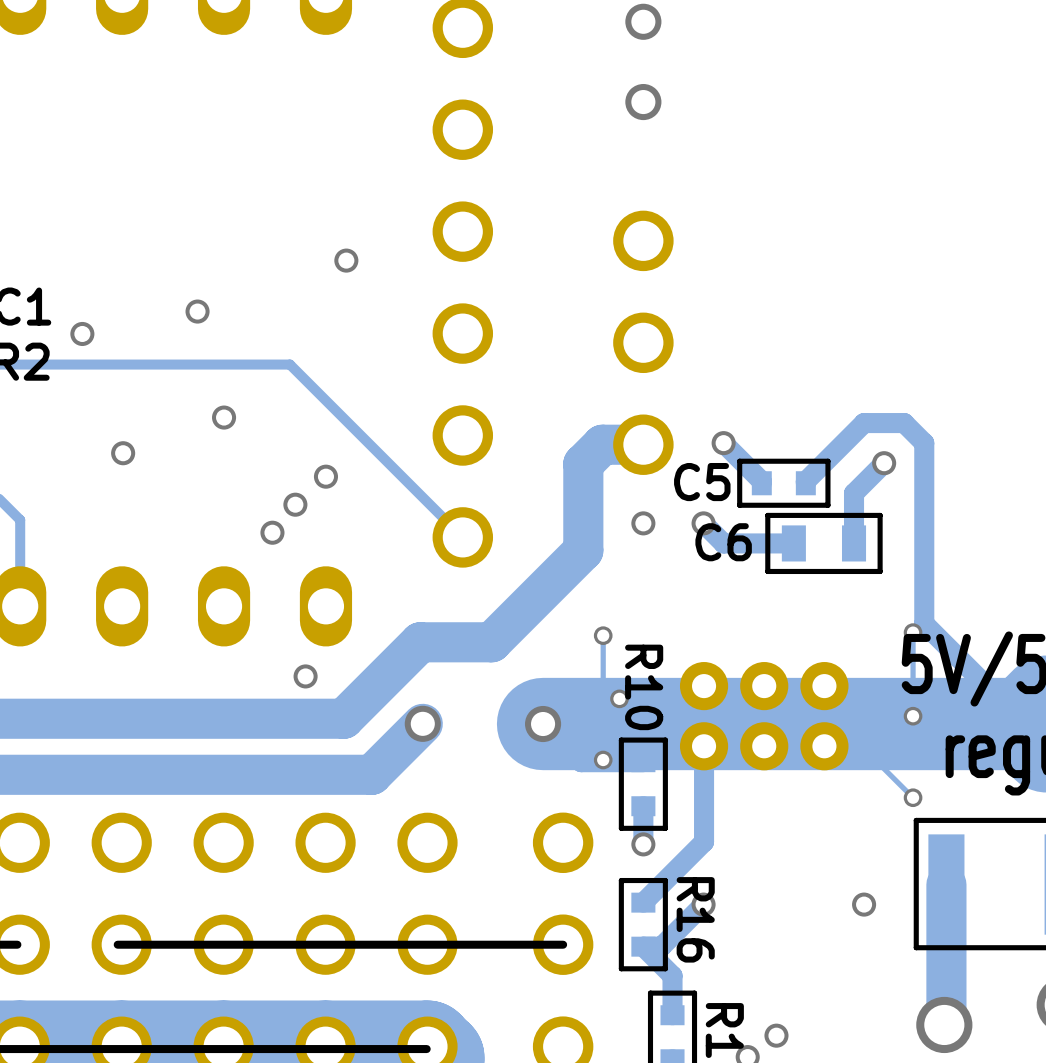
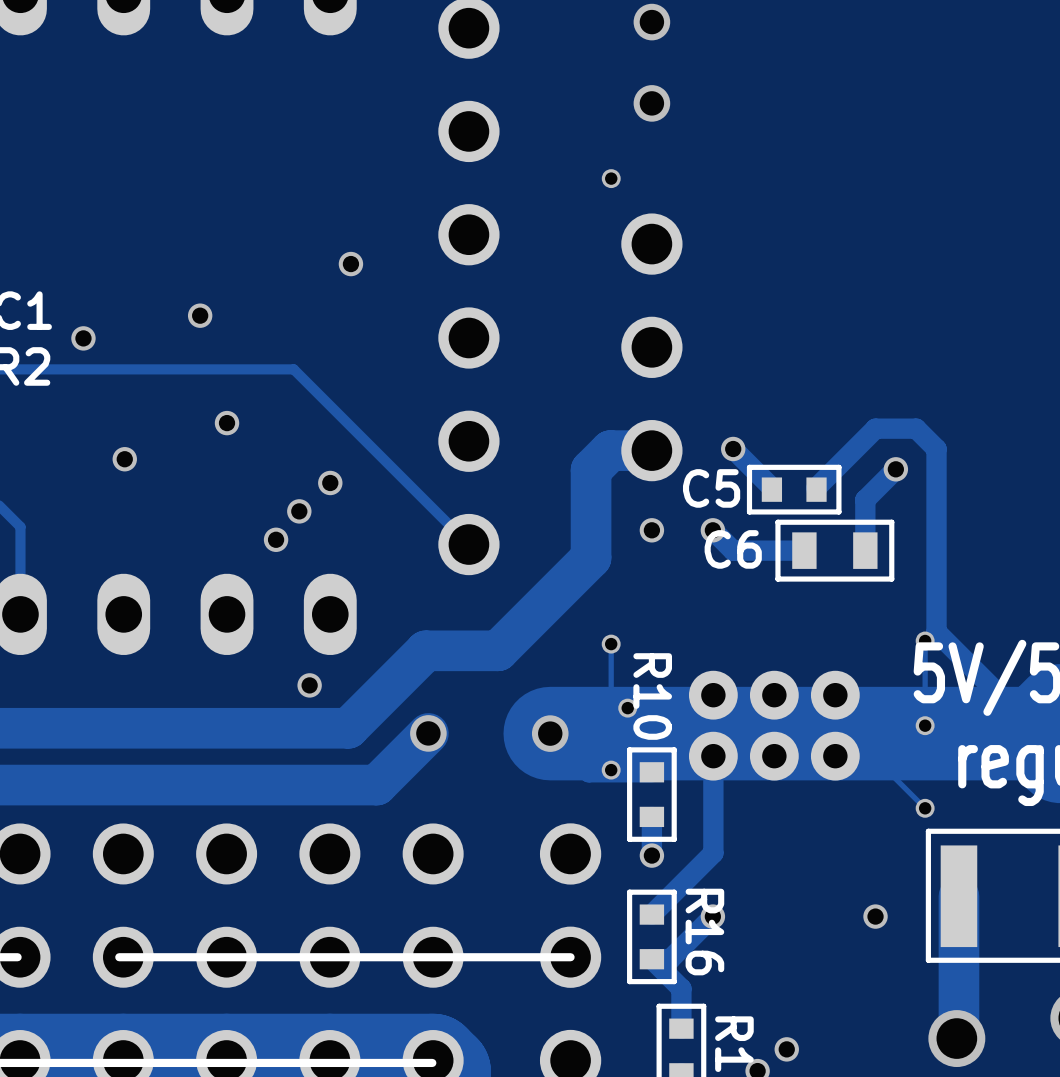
via: none -> (611, 178)

